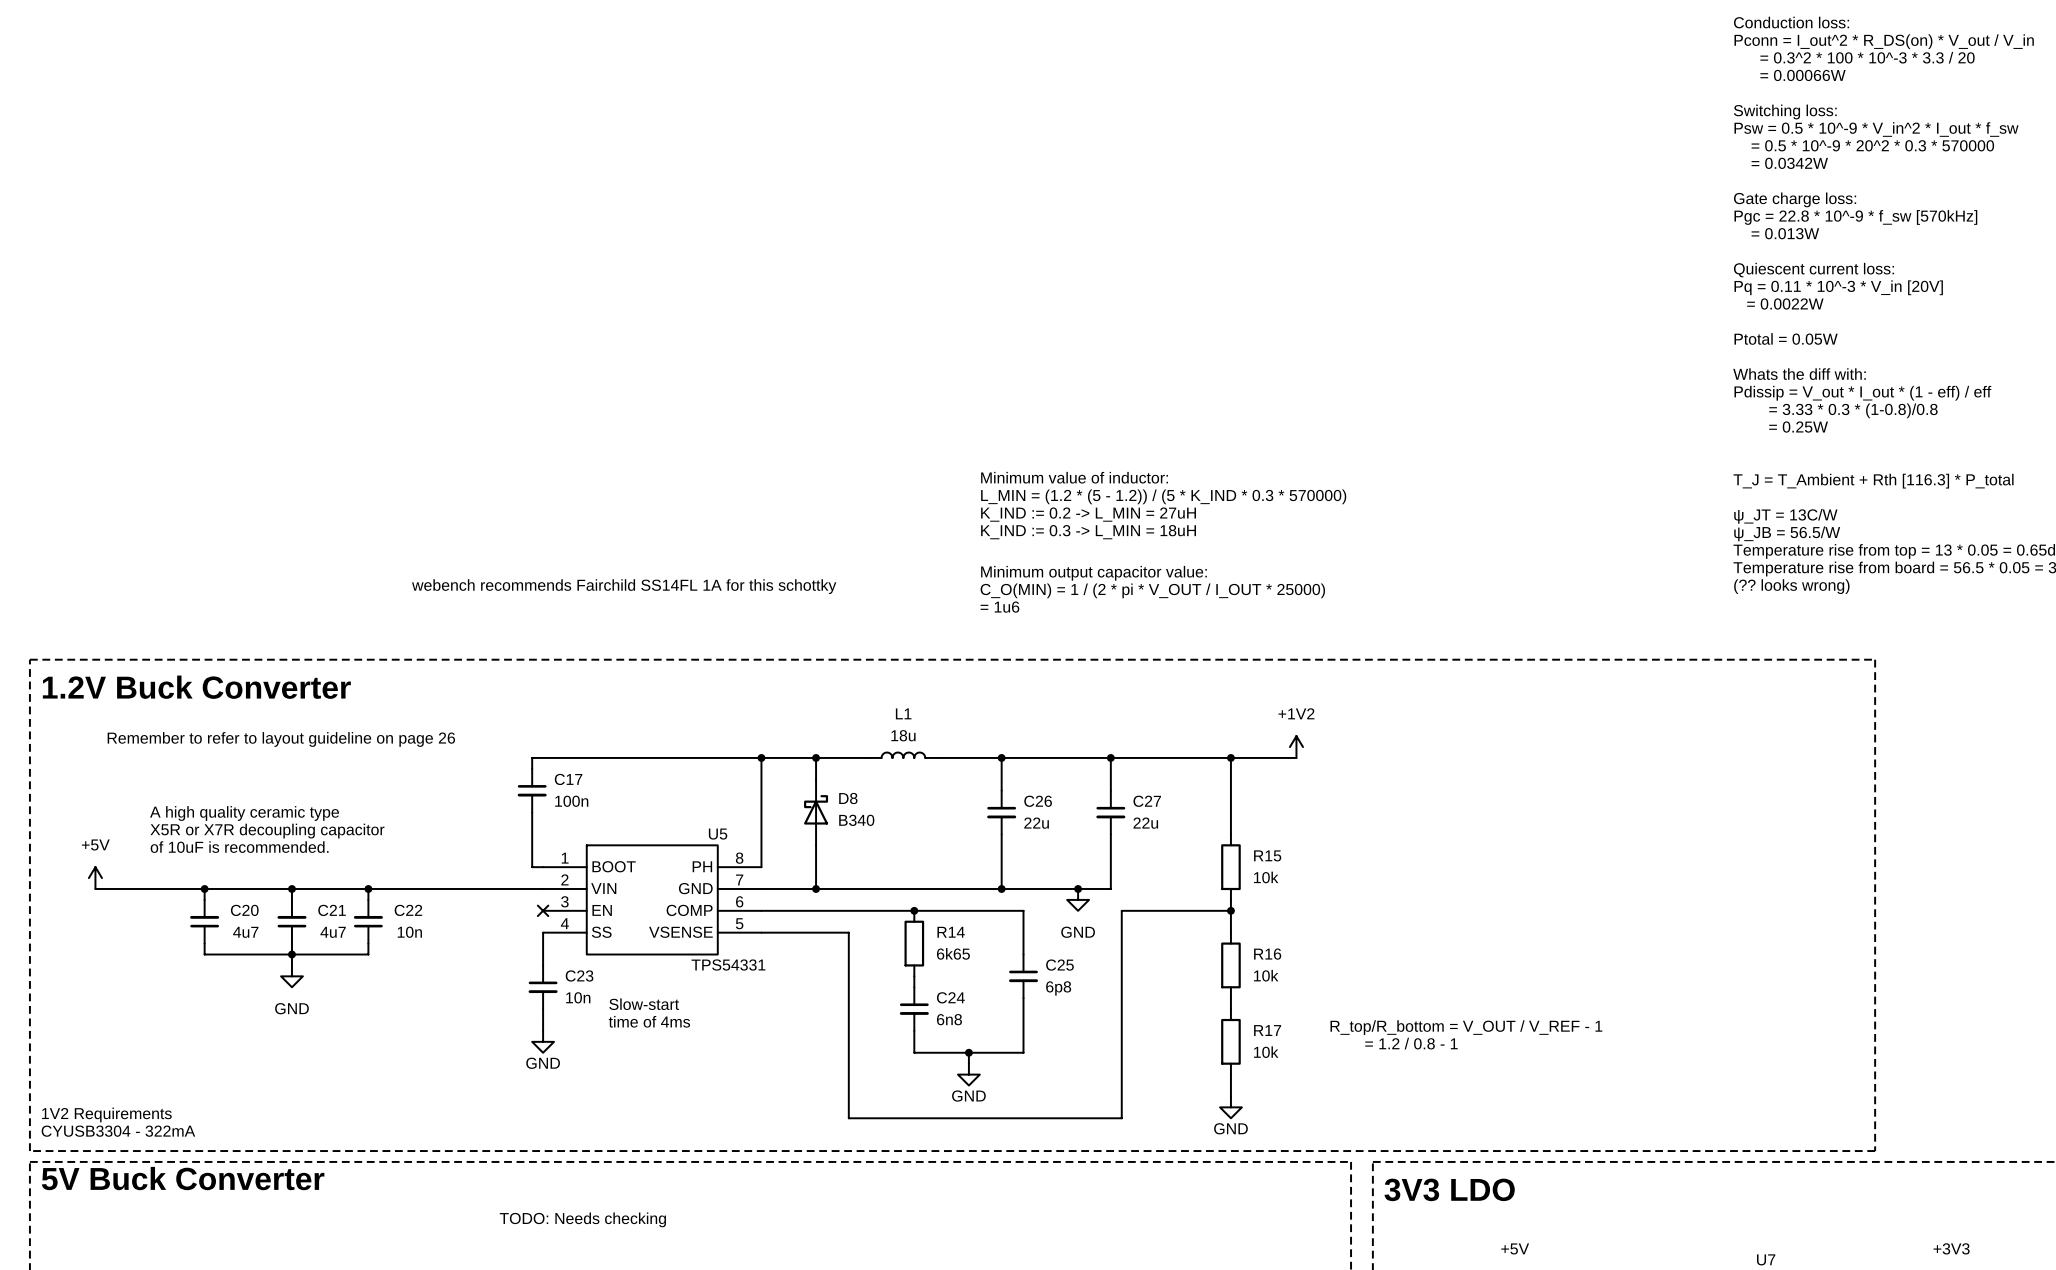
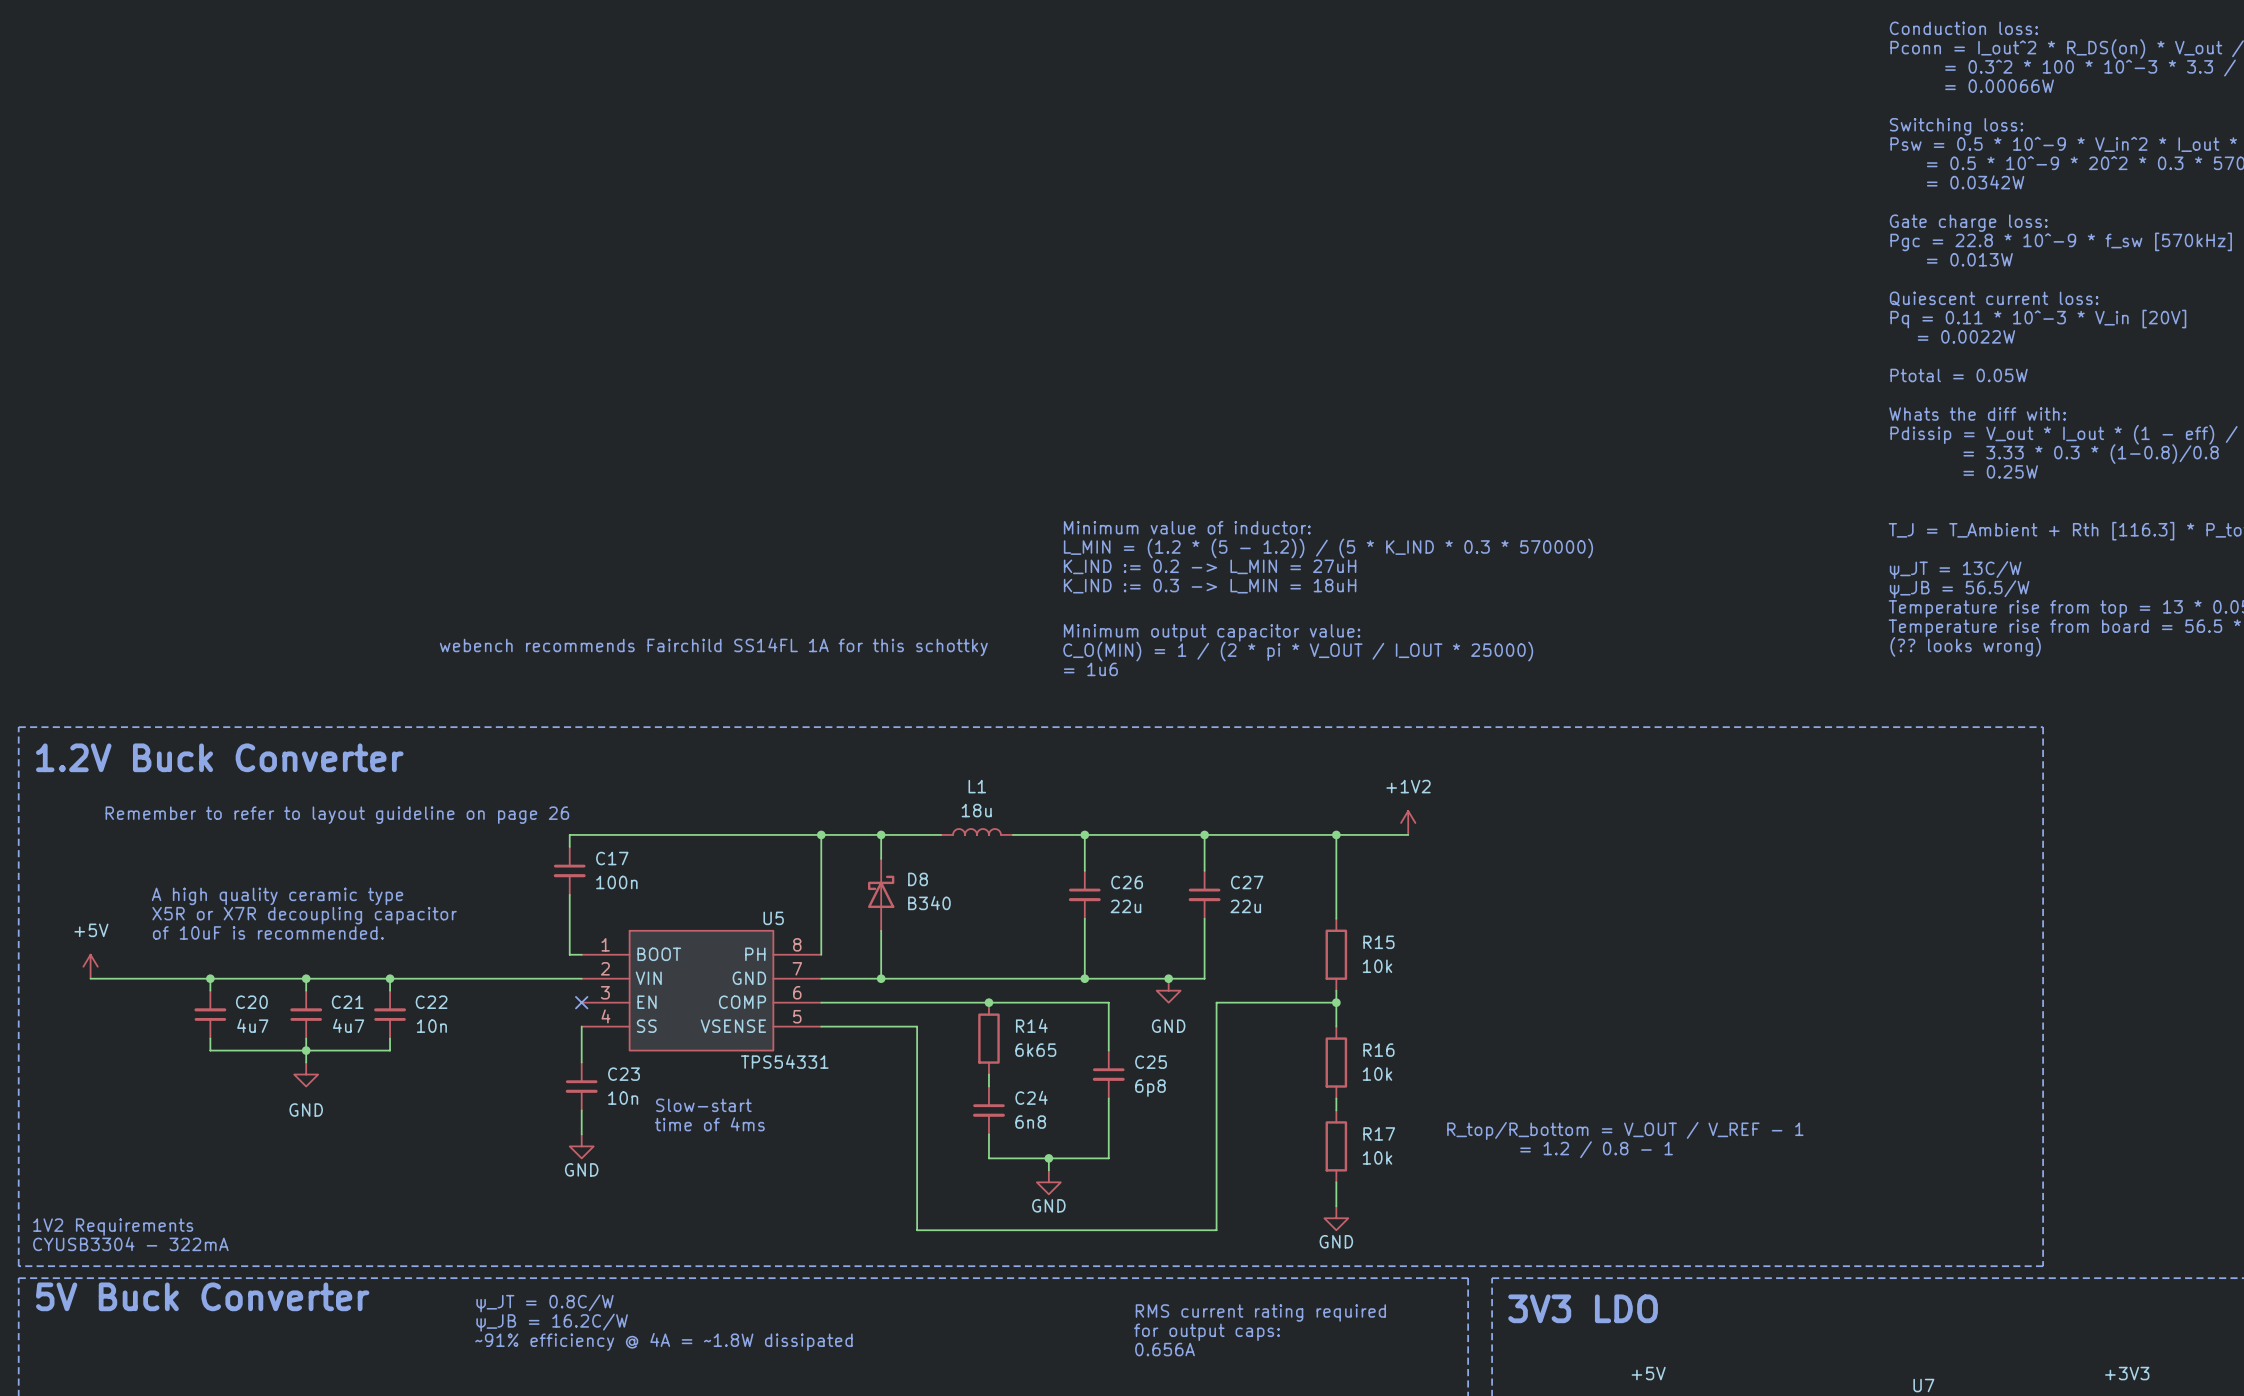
text: none -> ψ_JT = 0.8C/W (545, 1303)
text: none -> RMS current rating required (1260, 1312)
text: none -> ψ_JB = 16.2C/W (552, 1322)
text: none -> for output caps: (1206, 1332)
text: TODO: Needs checking (582, 1219) -> none
text: none -> ~91% efficiency @ 4A = ~1.8W dissipated (663, 1341)
text: none -> 0.656A (1165, 1349)

